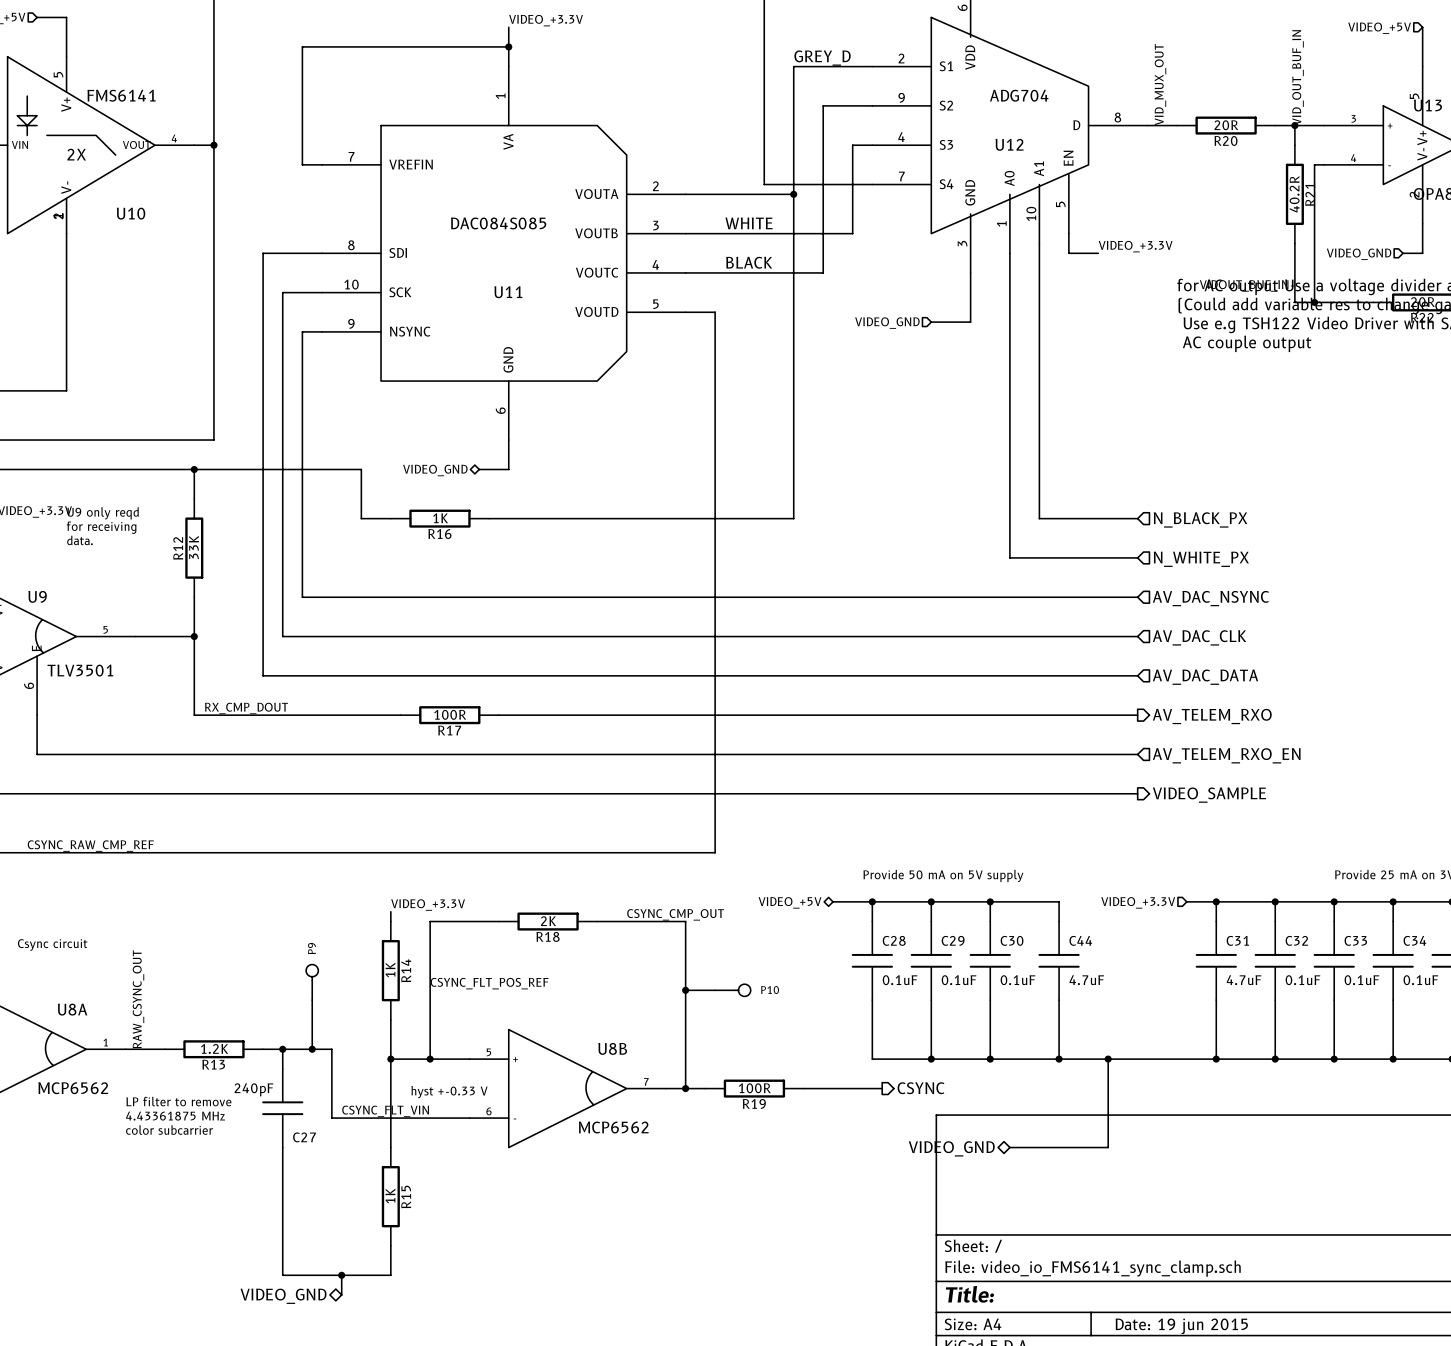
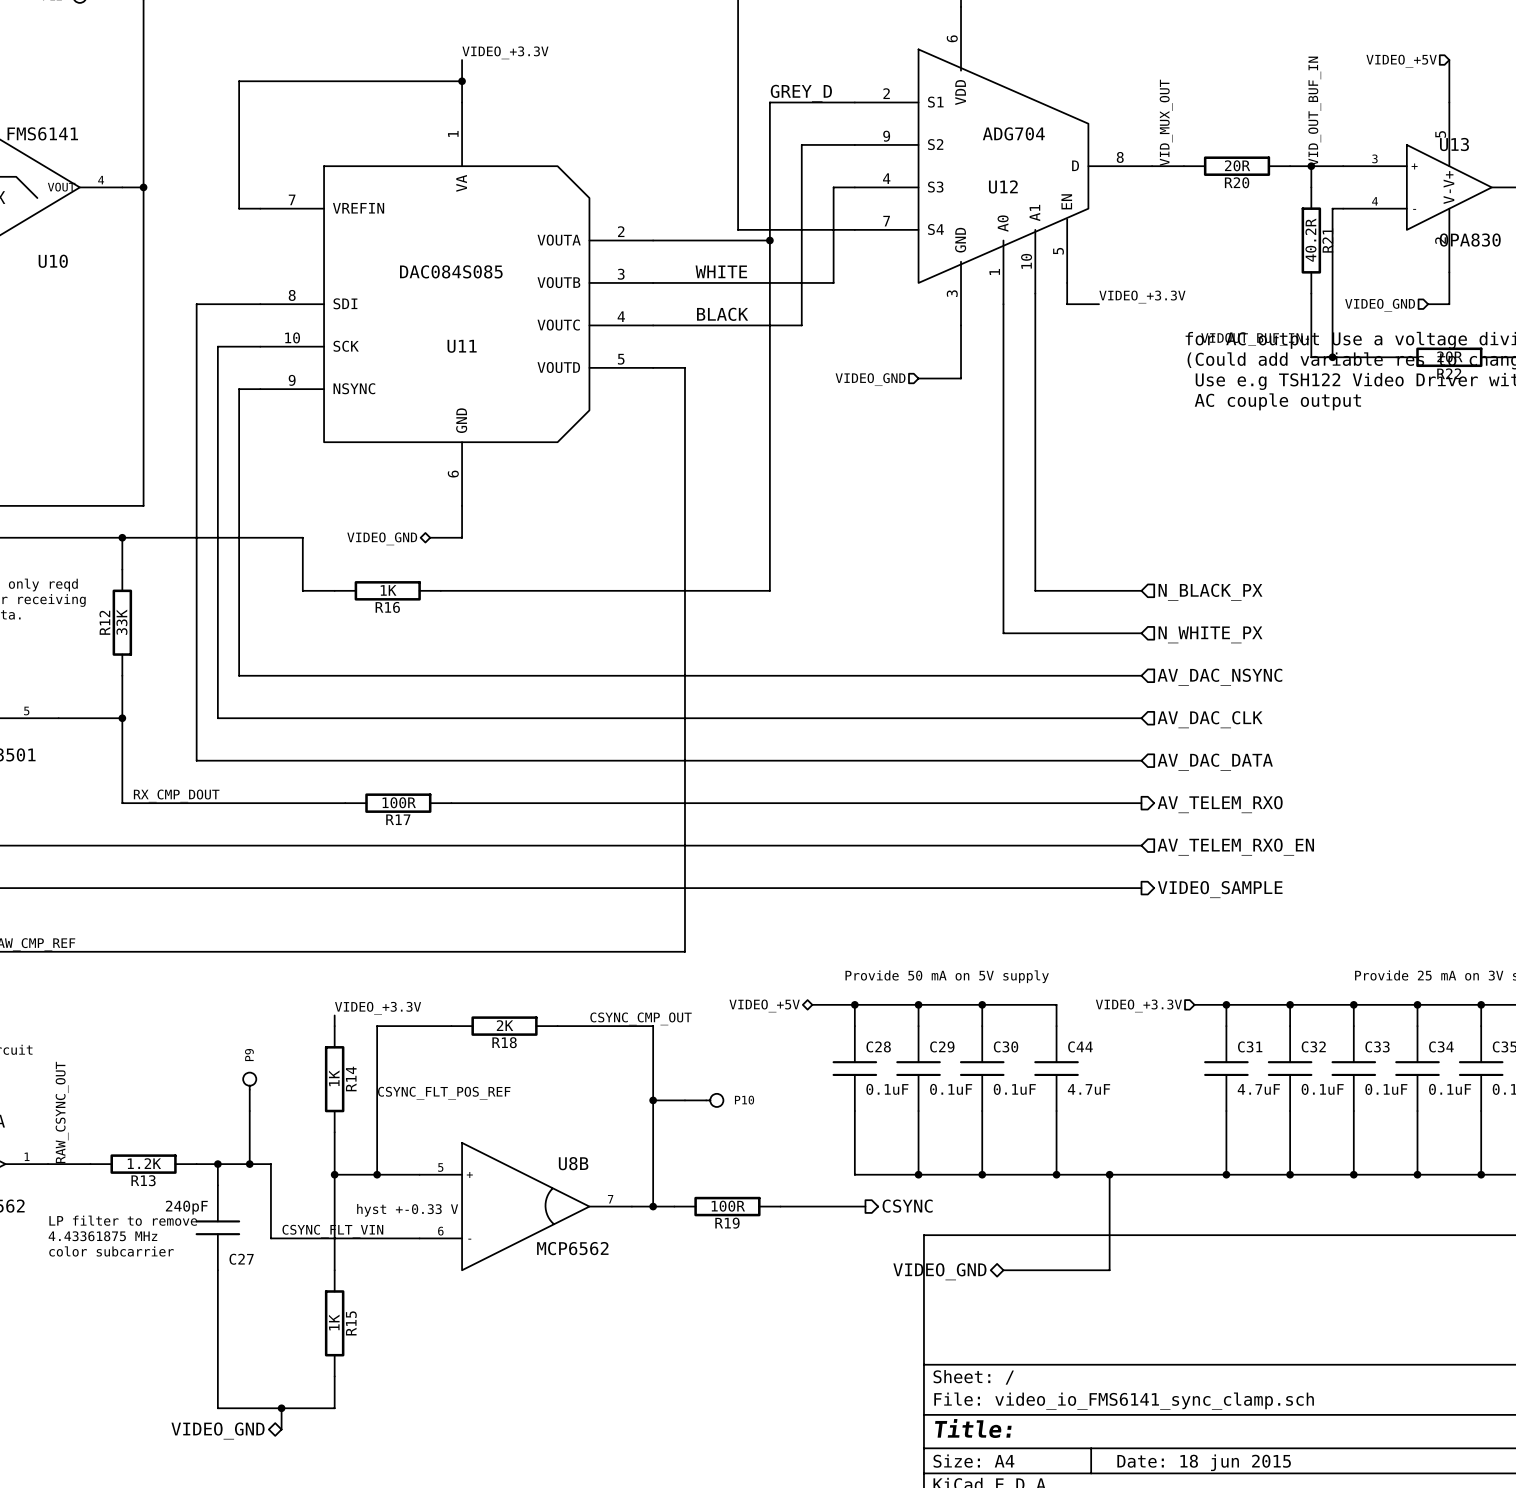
title block: Date: 19 jun 2015 (1181, 1326) -> Date: 18 jun 2015 (1204, 1462)

